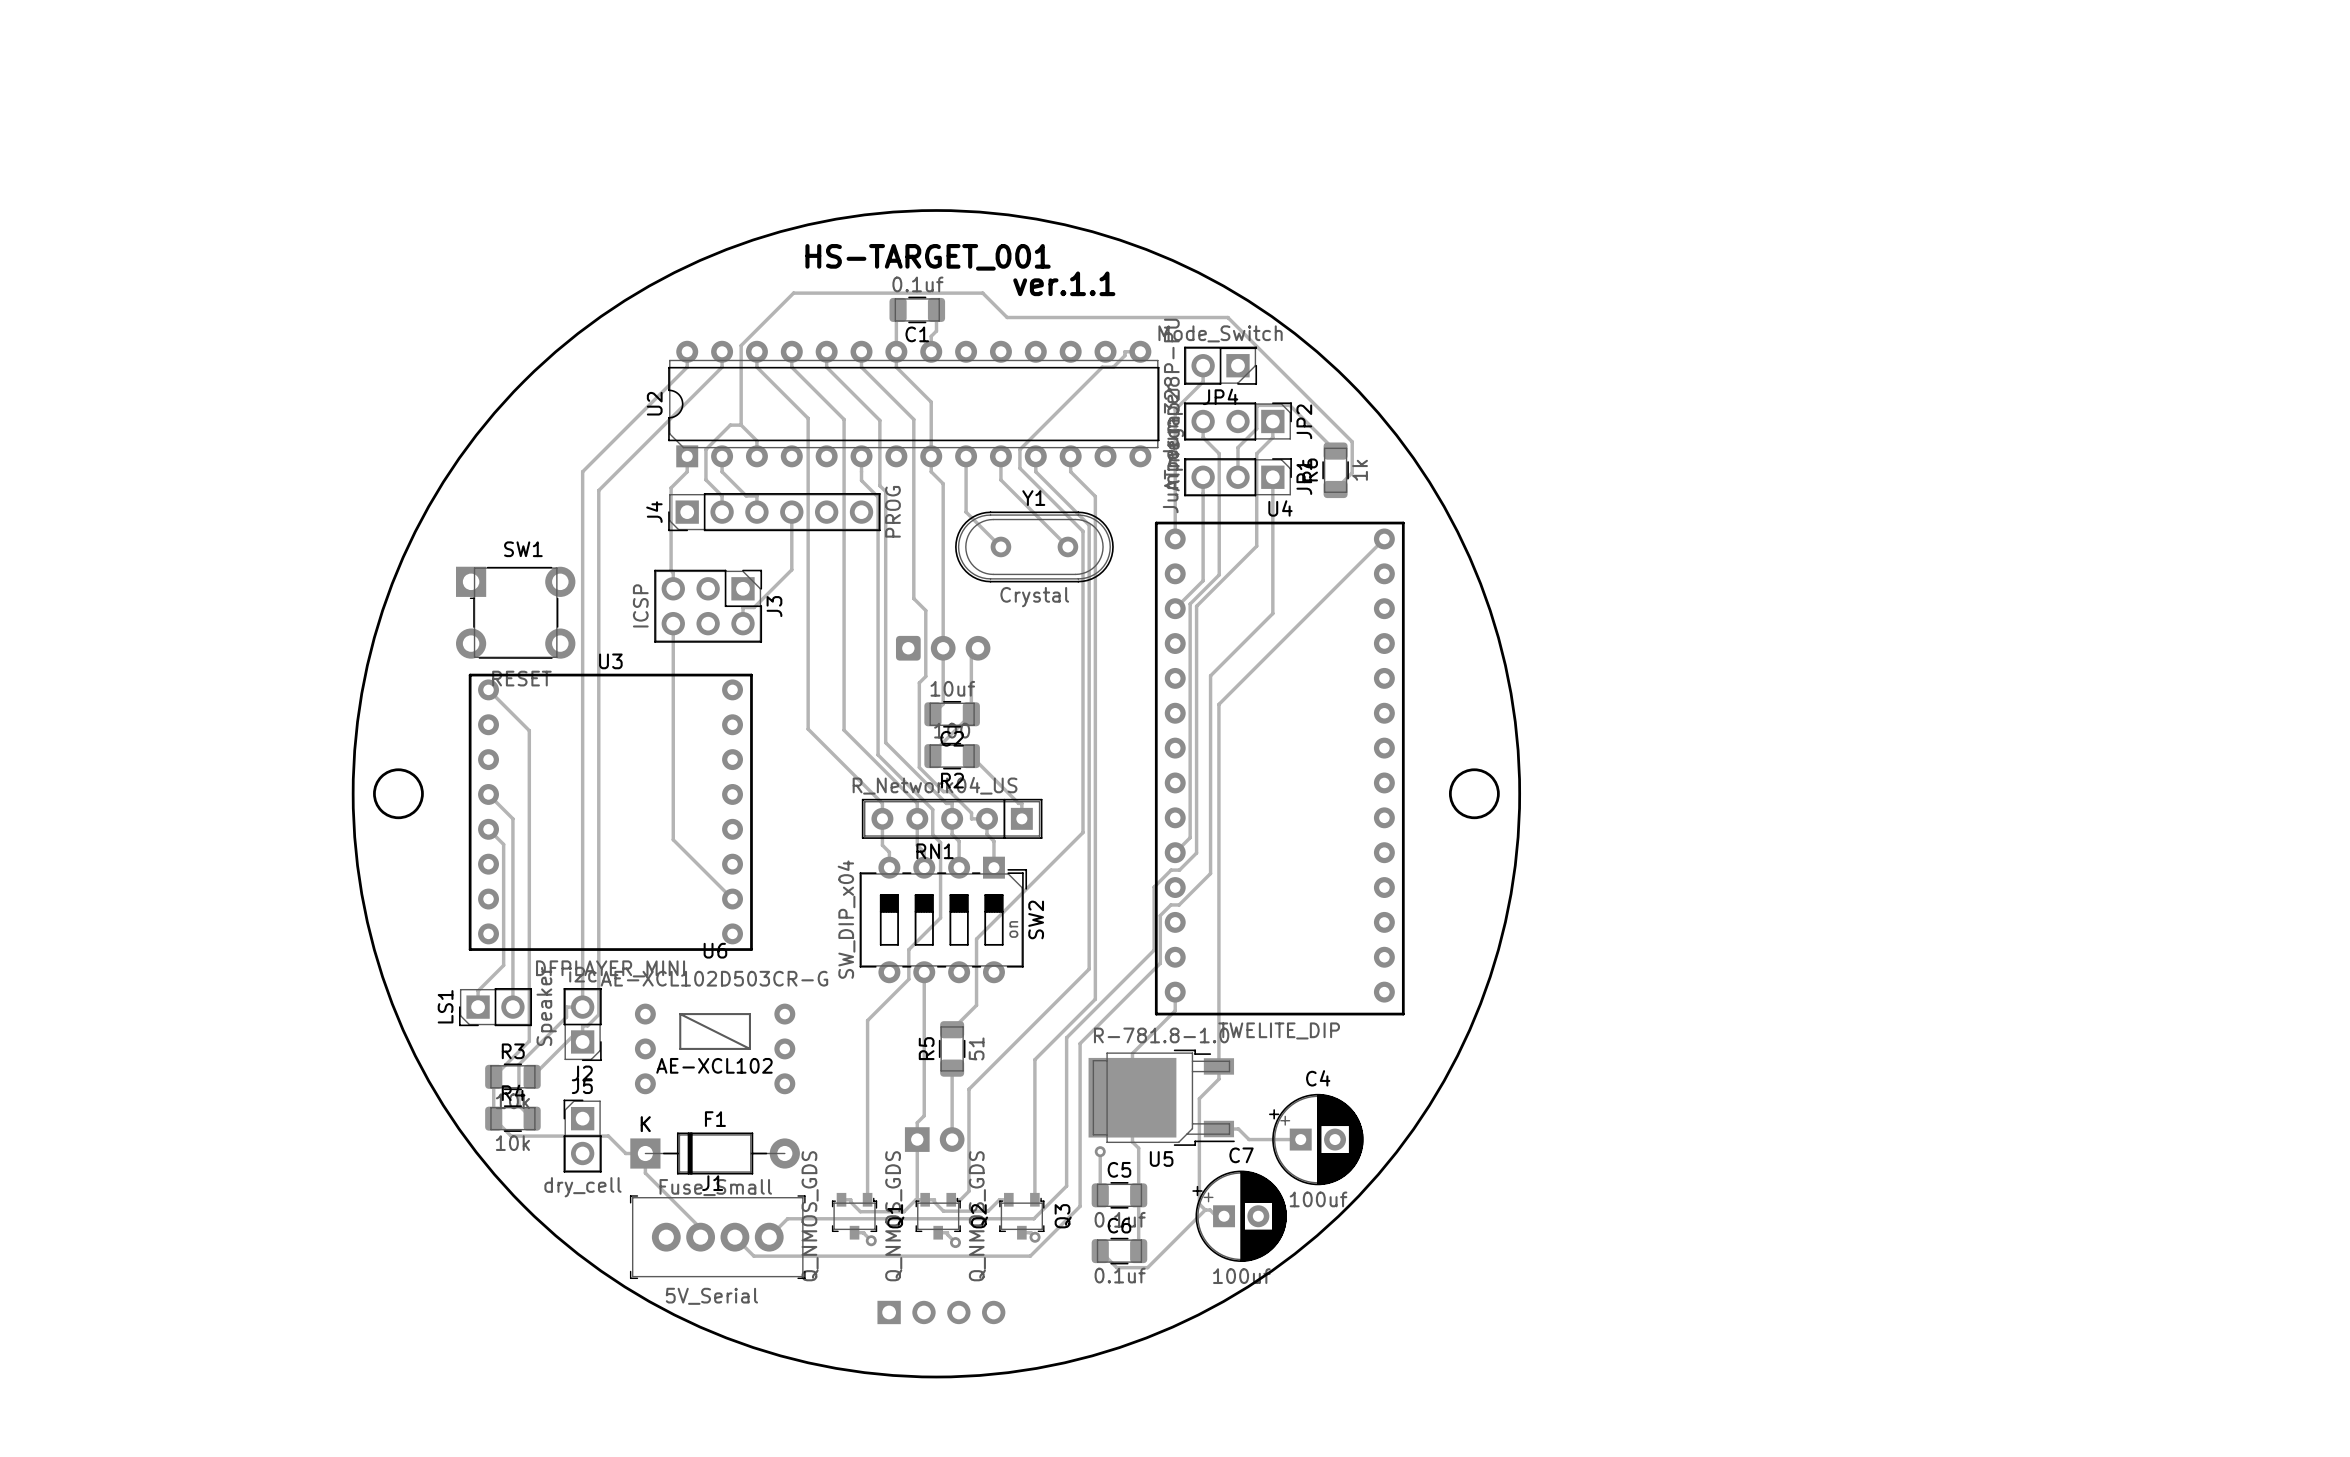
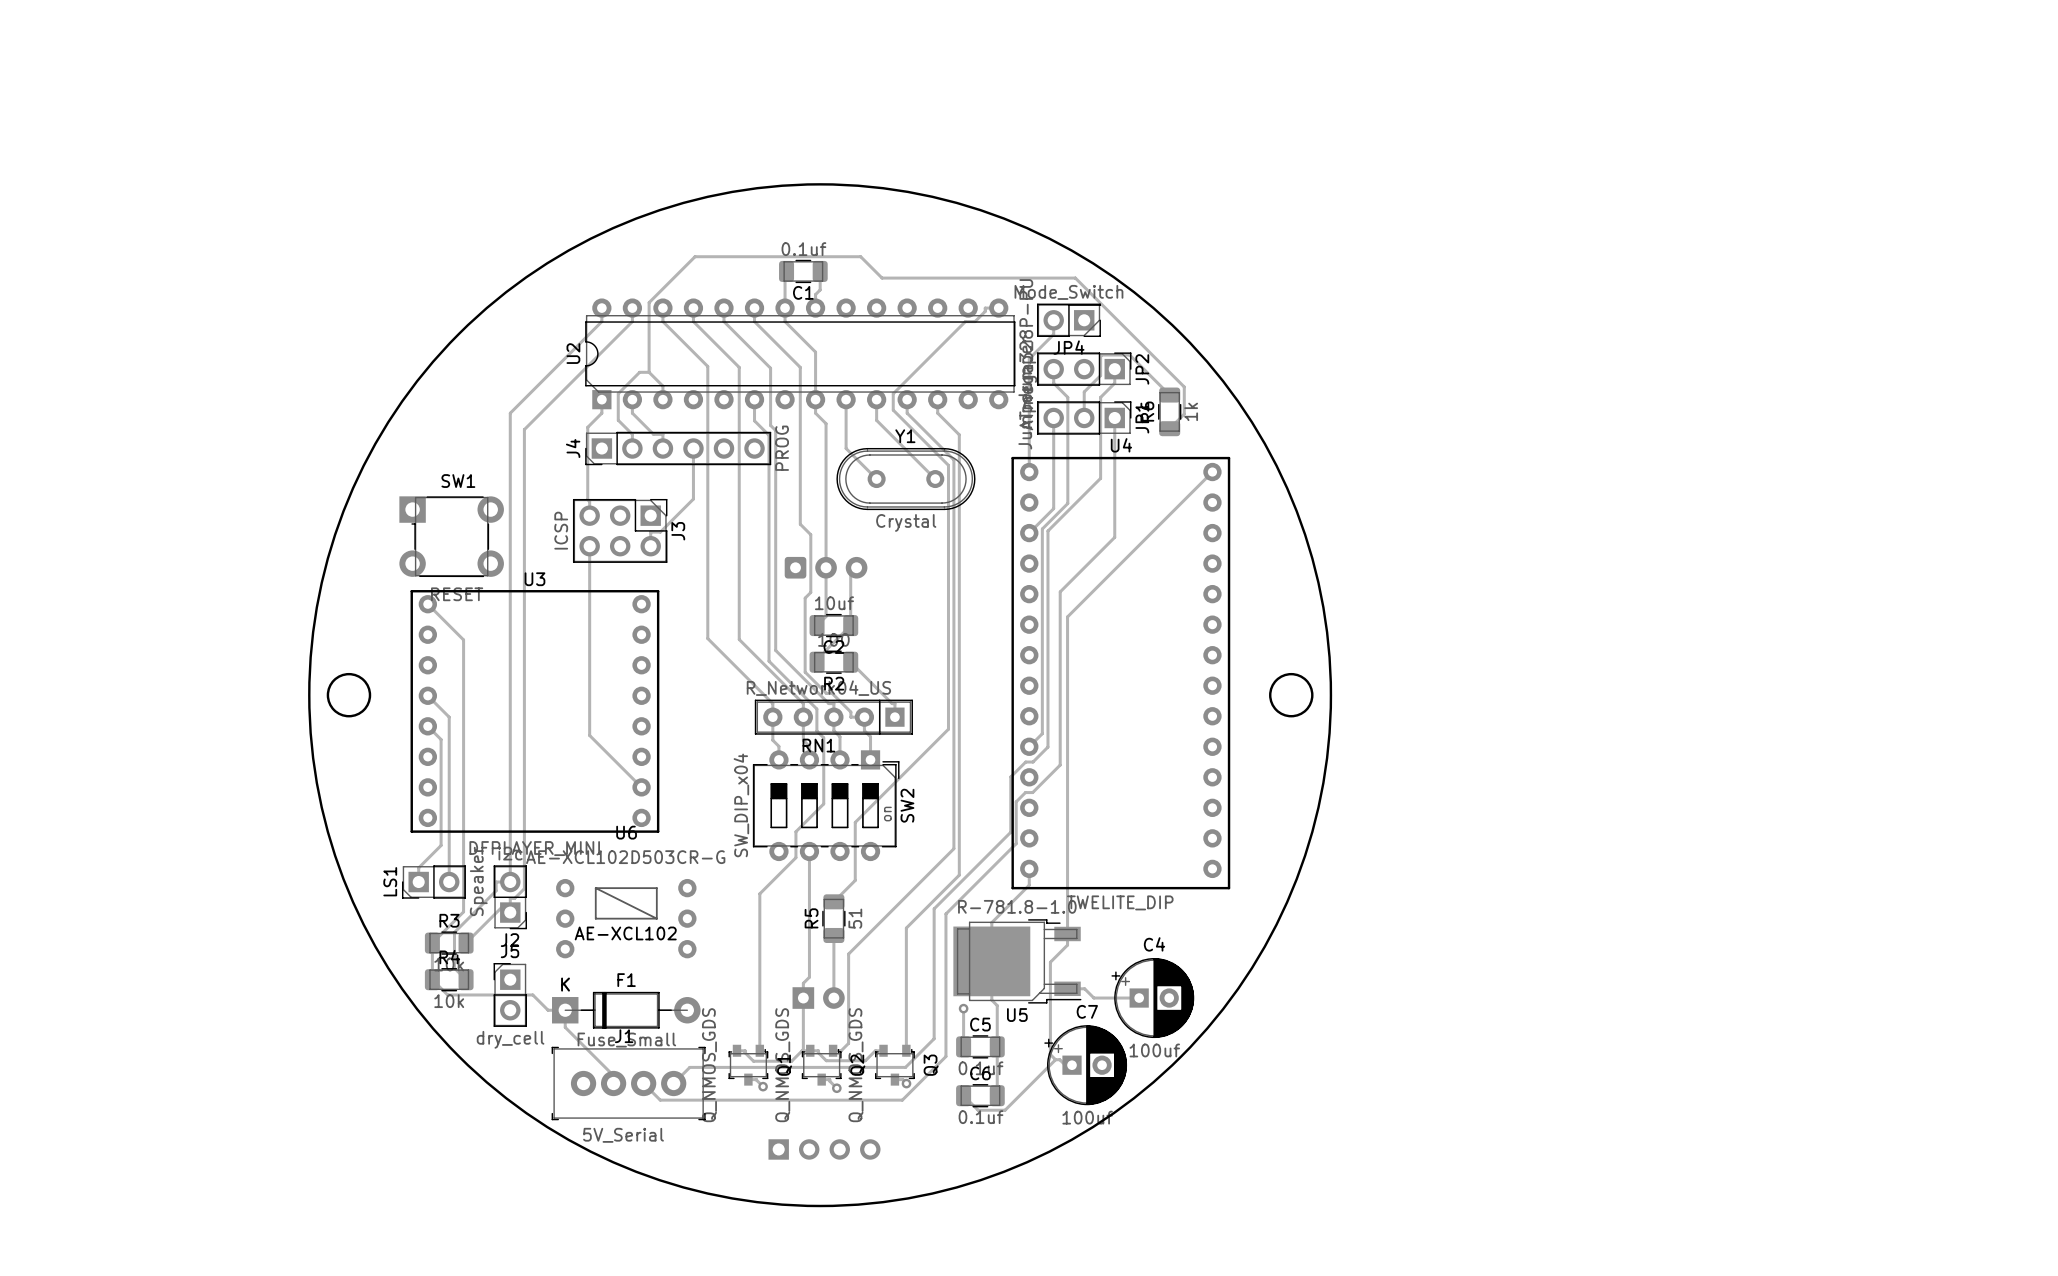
text: HS-TARGET_001 (928, 257) -> none
text: ver.1.1 (1064, 283) -> none

